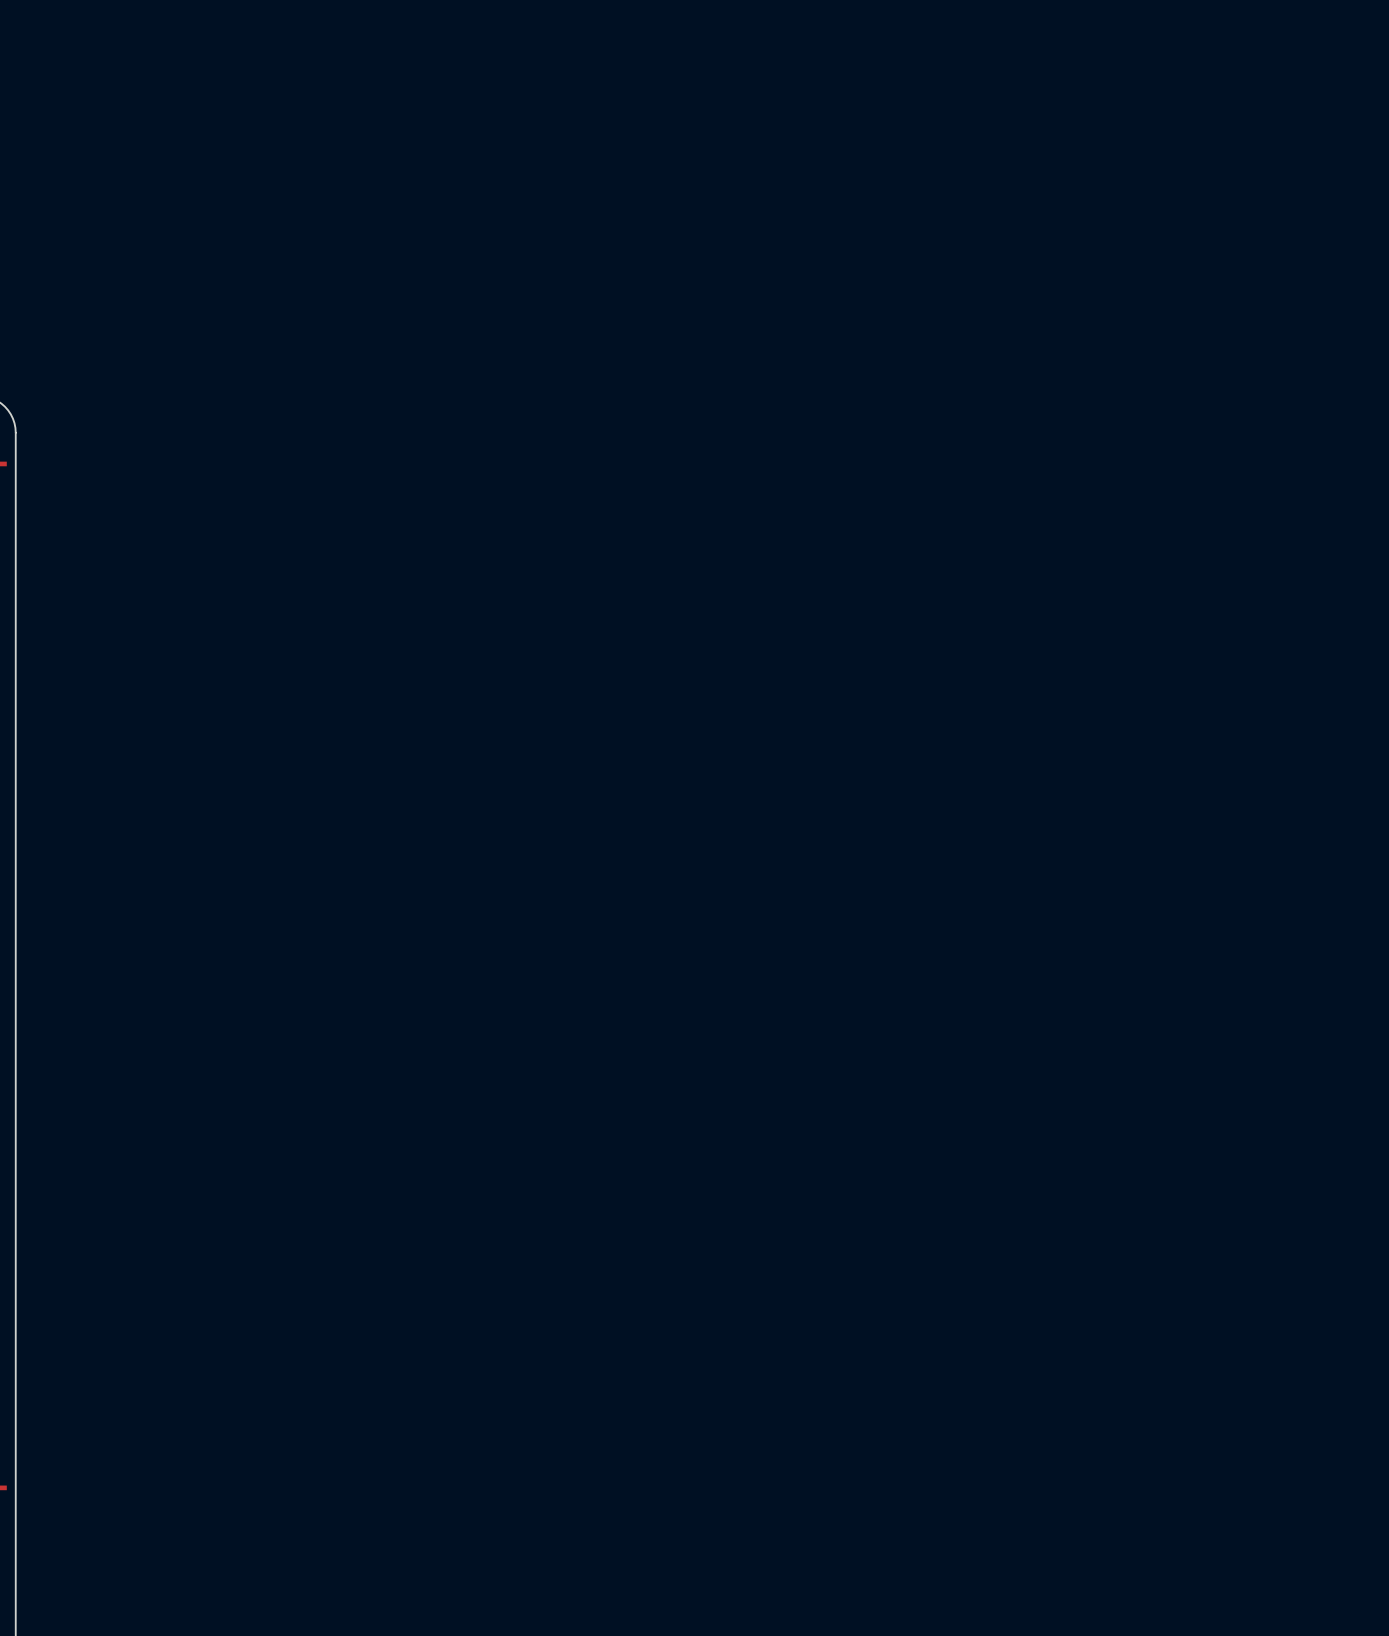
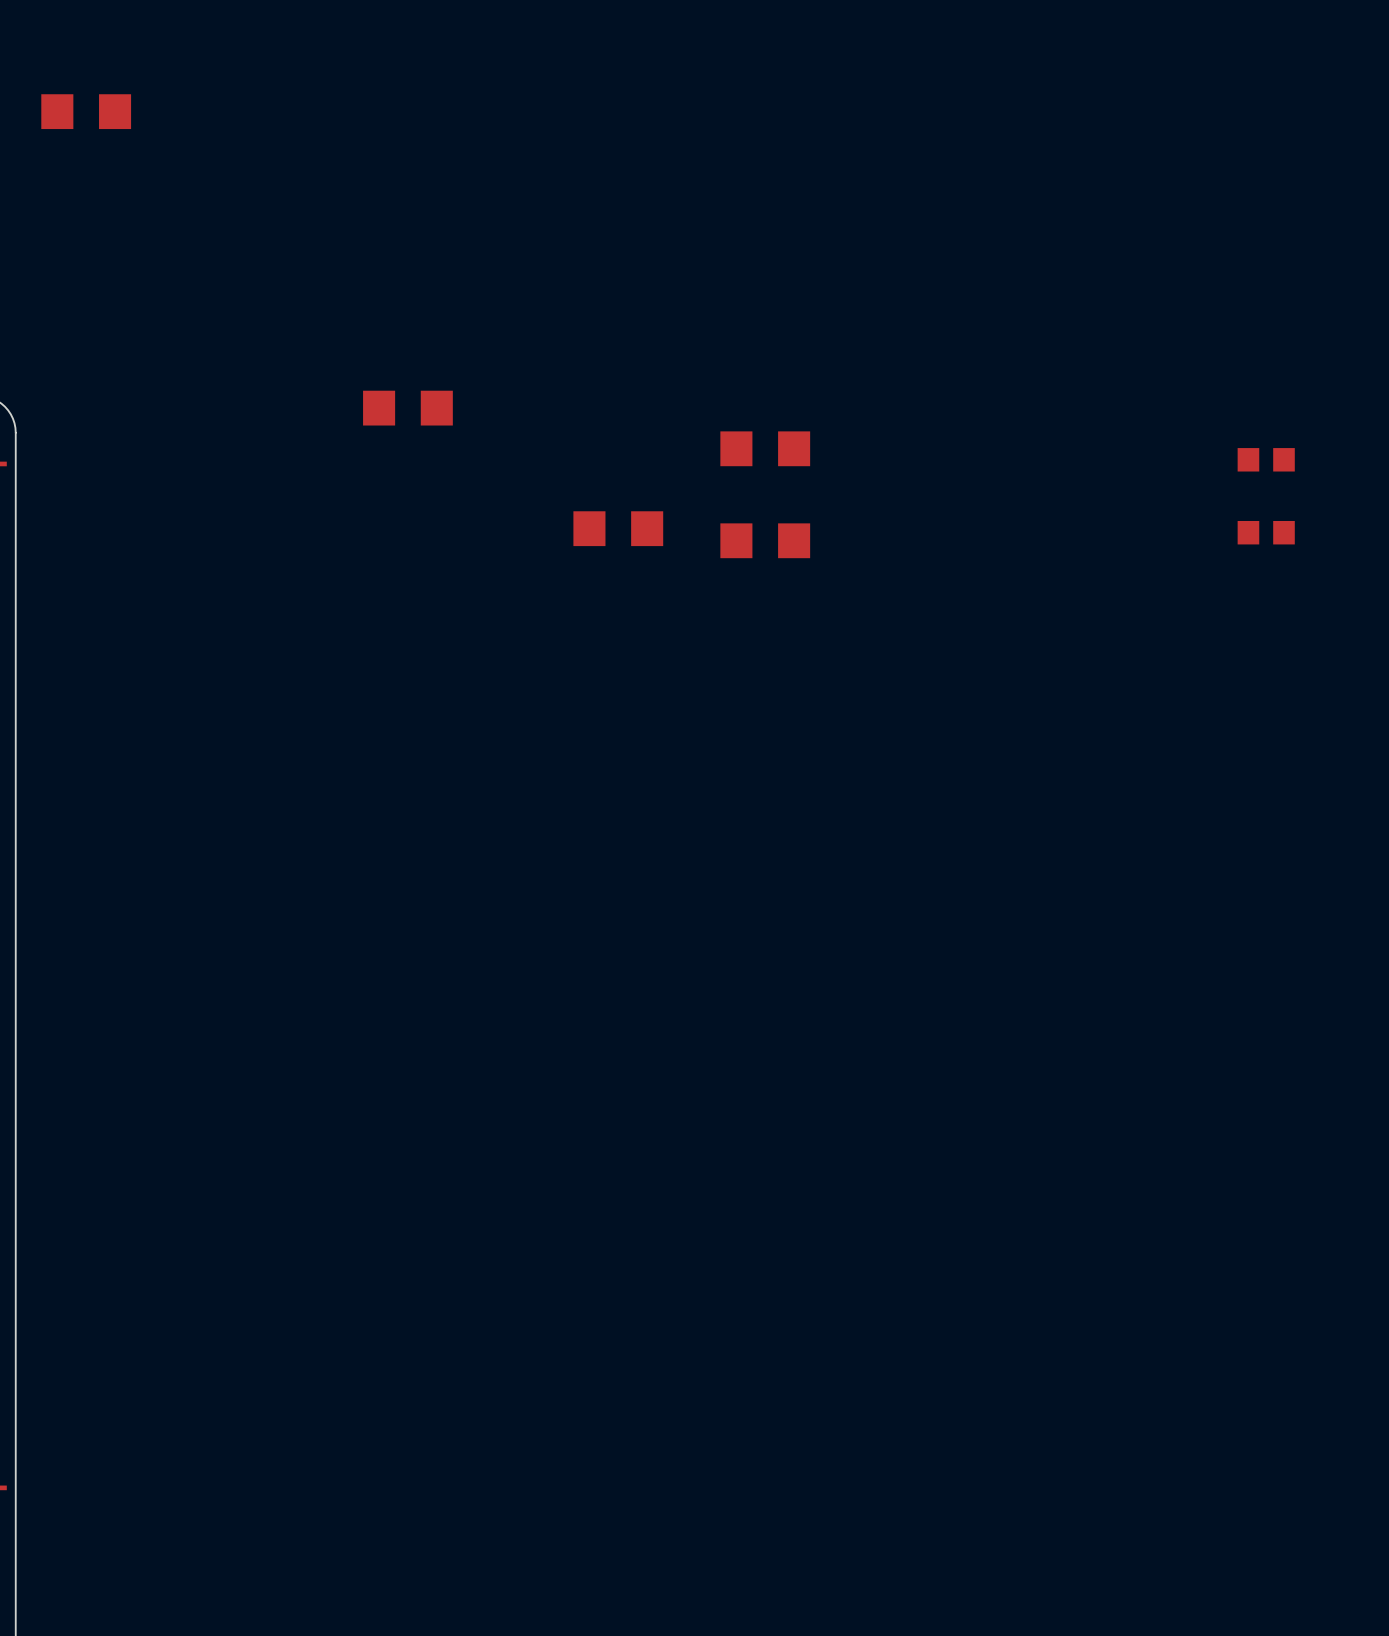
part: none -> (86, 111)
part: none -> (407, 408)
part: none -> (765, 448)
part: none -> (1266, 459)
part: none -> (618, 528)
part: none -> (1266, 532)
part: none -> (765, 540)

